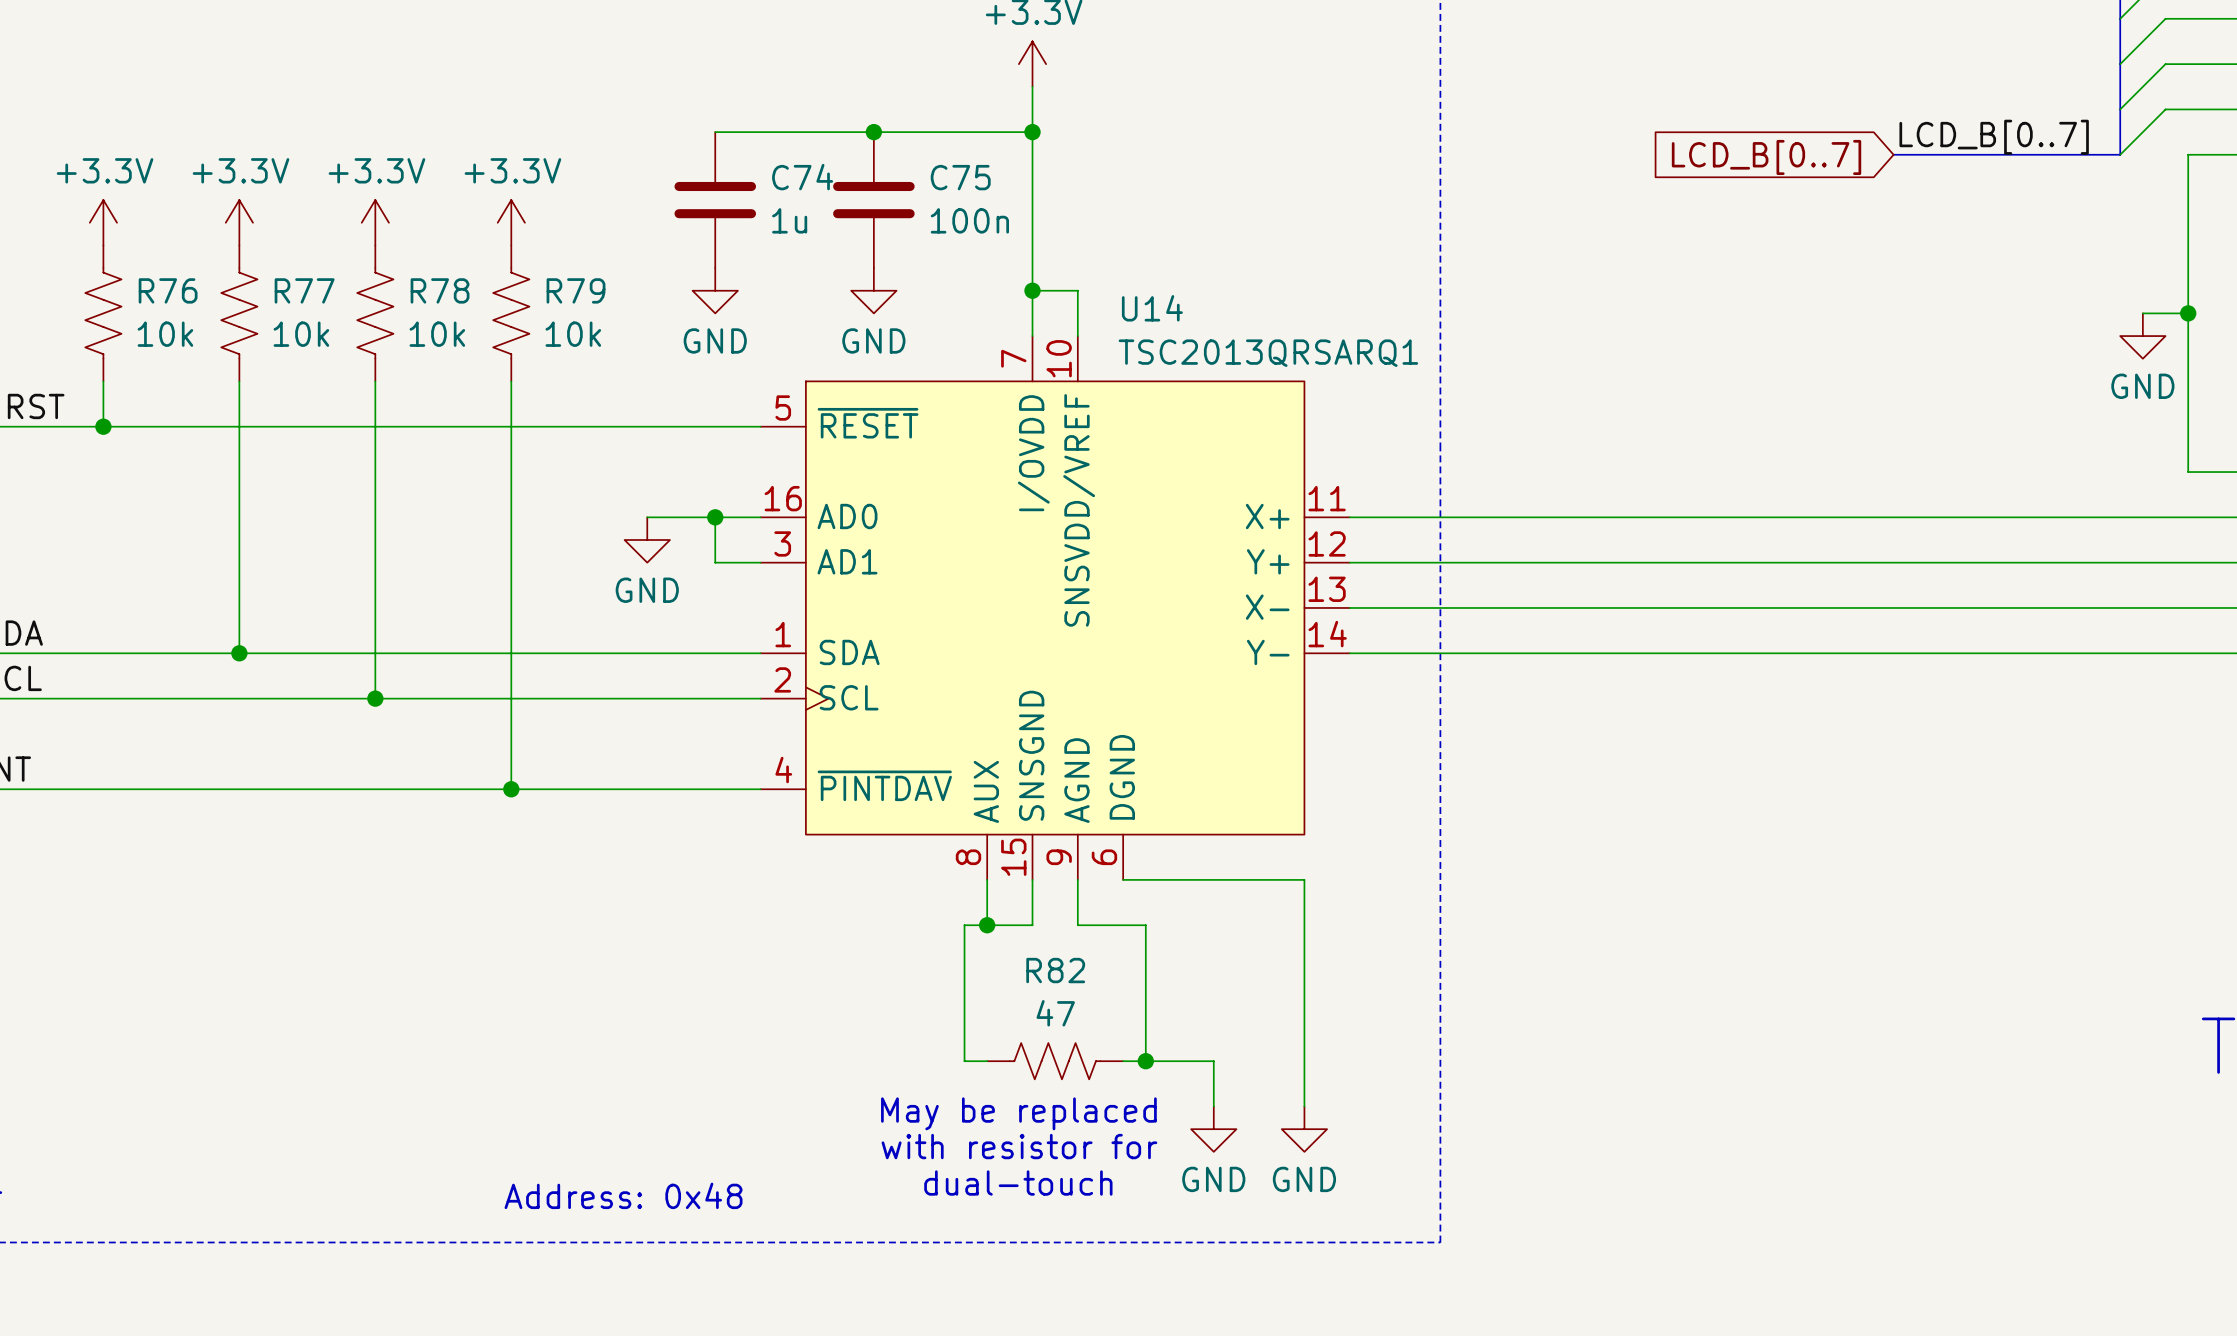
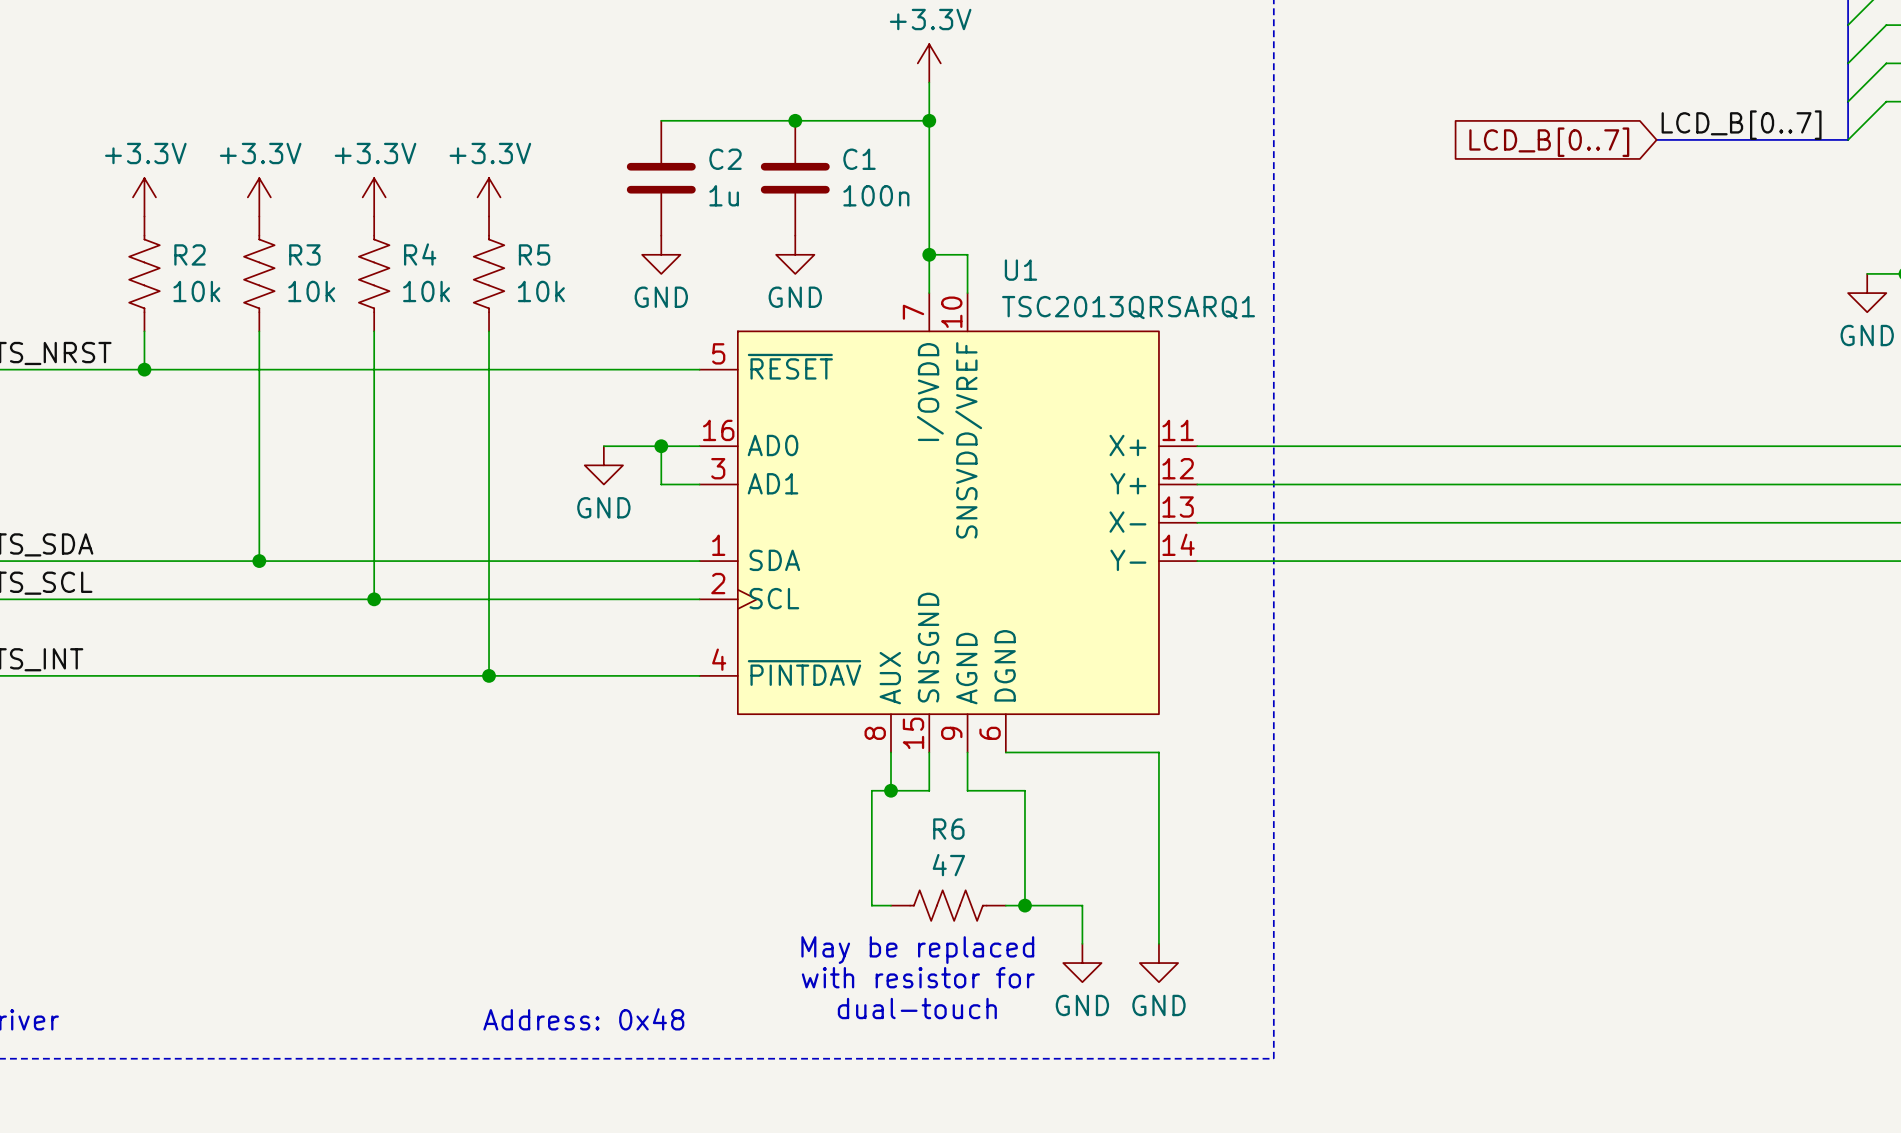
C74 name: C74 (802, 177) -> C2 (725, 159)
C75 name: C75 (960, 177) -> C1 (859, 159)
R76 name: R76 (168, 290) -> R2 (190, 254)
R77 name: R77 (304, 290) -> R3 (304, 254)
R78 name: R78 (440, 290) -> R4 (420, 254)
R79 name: R79 (576, 290) -> R5 (534, 254)
U14 name: U14 (1152, 308) -> U1 (1020, 270)
R82 name: R82 (1055, 970) -> R6 (948, 829)

